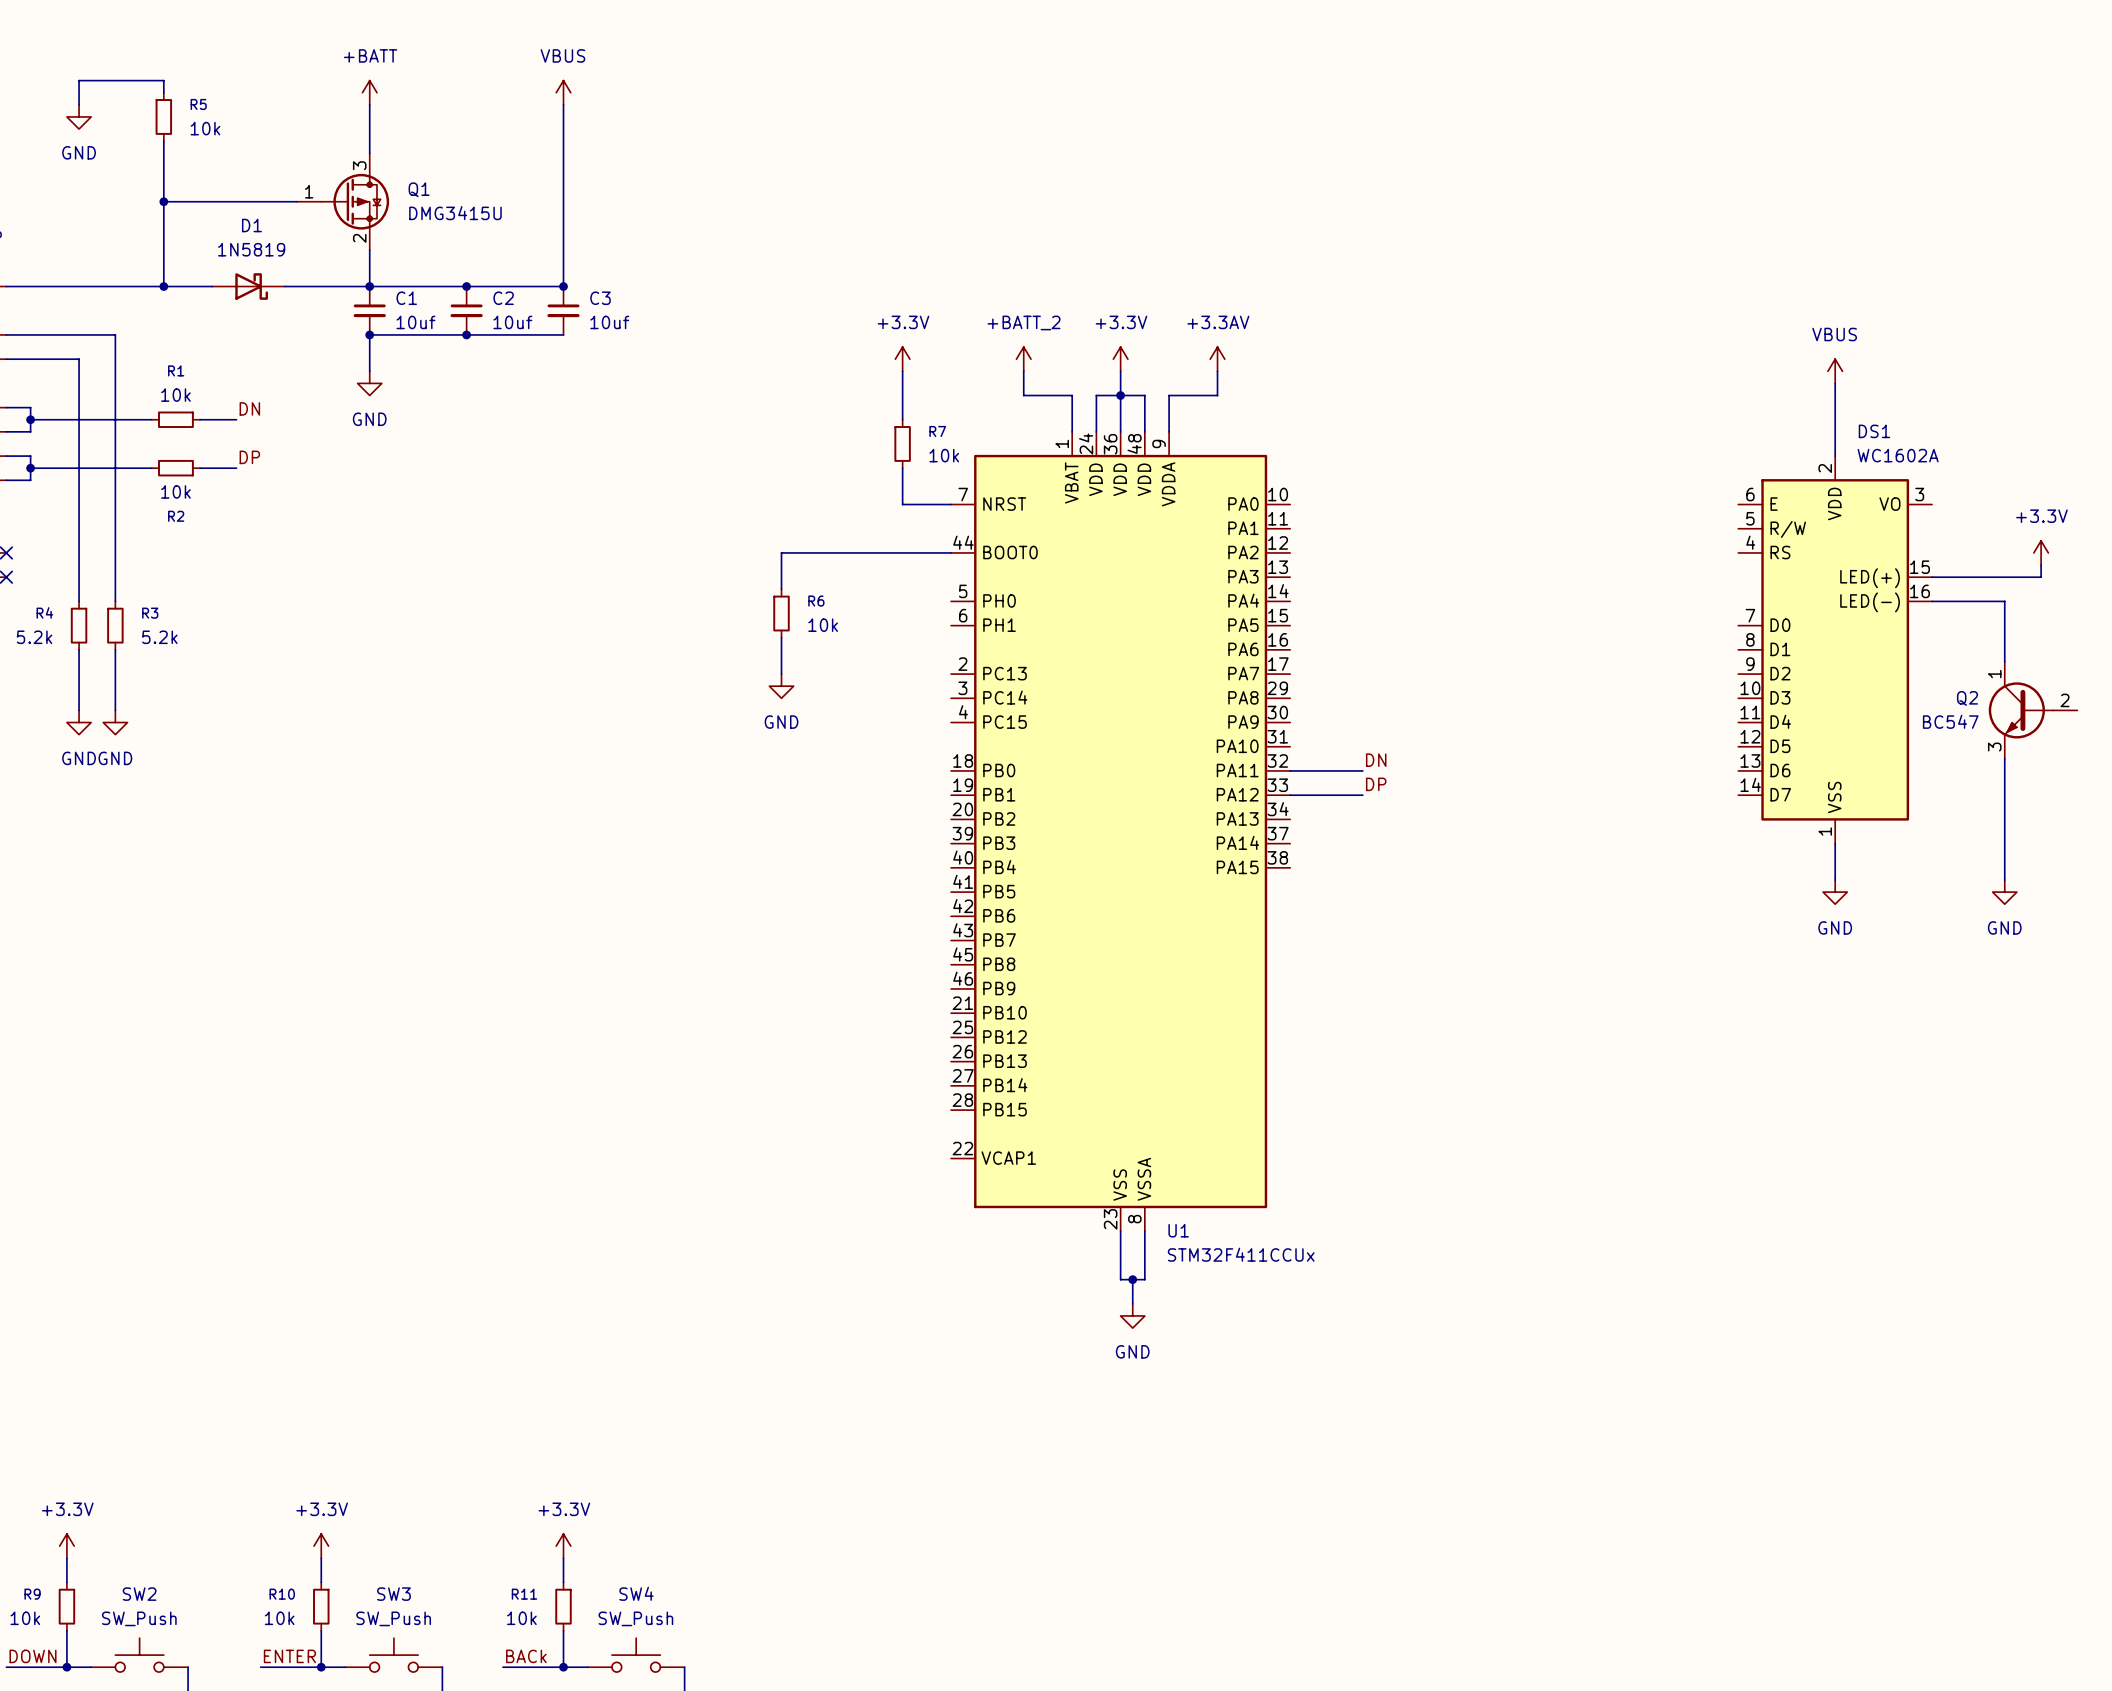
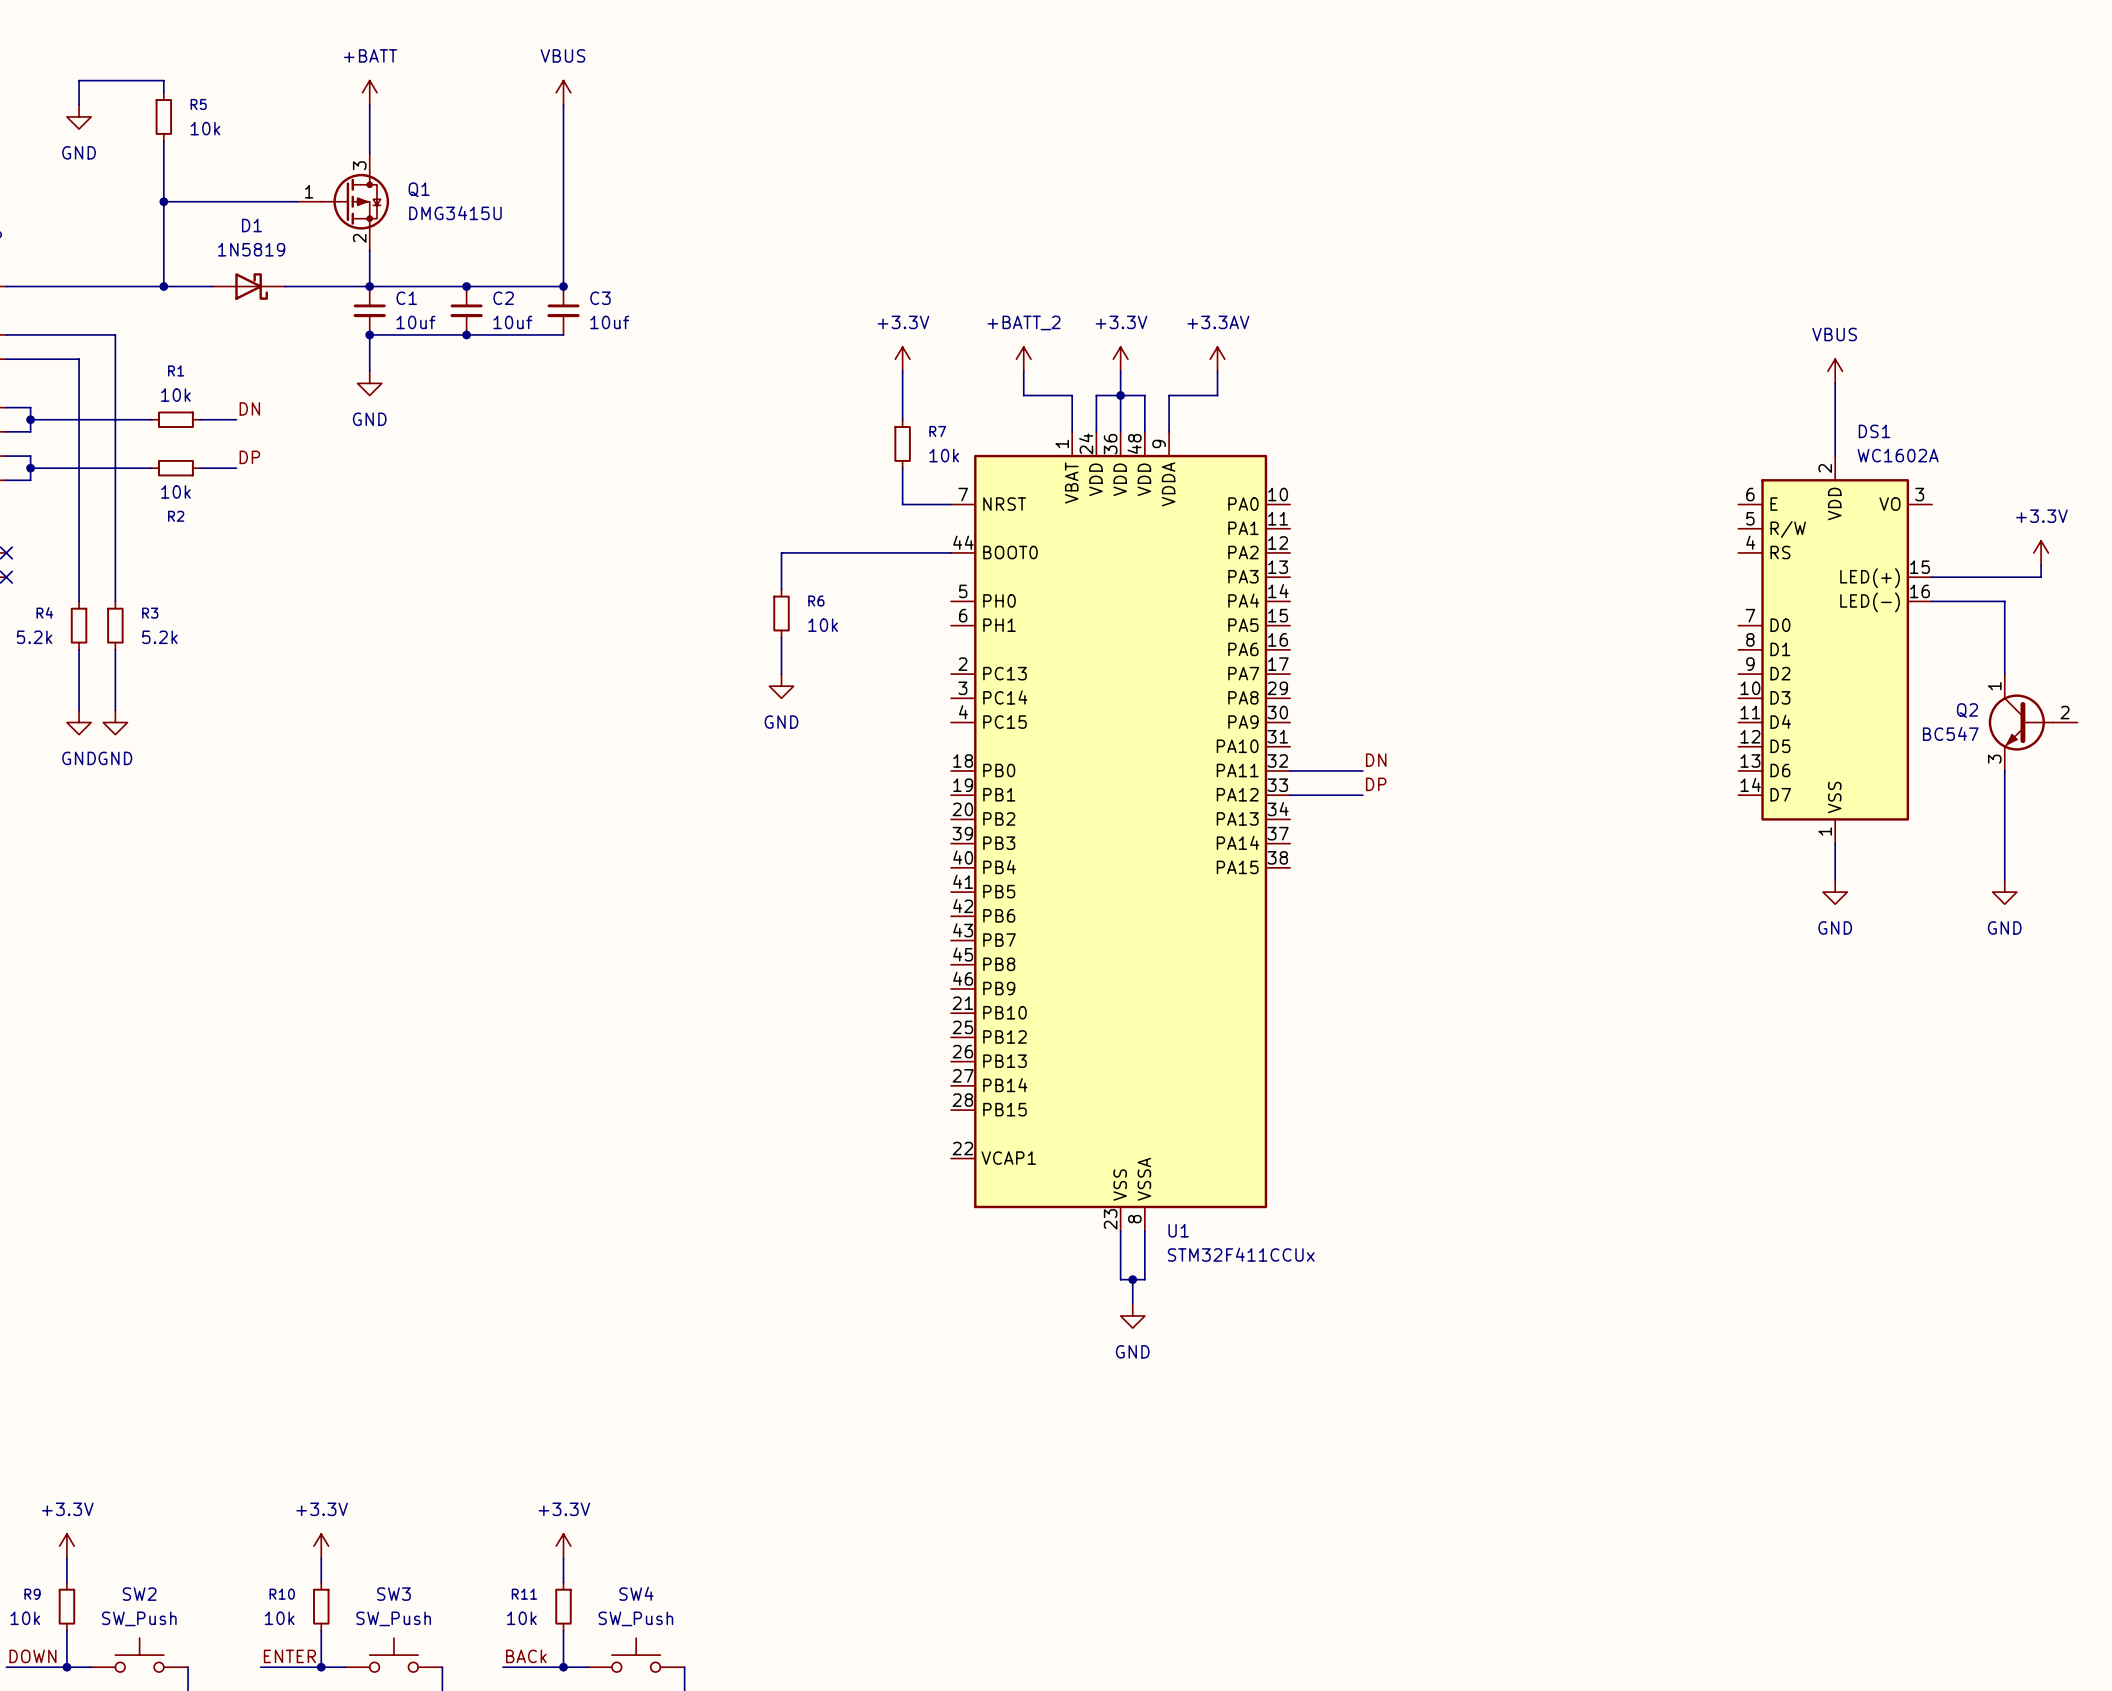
Q2 position: (2033, 710) -> (2033, 722)

